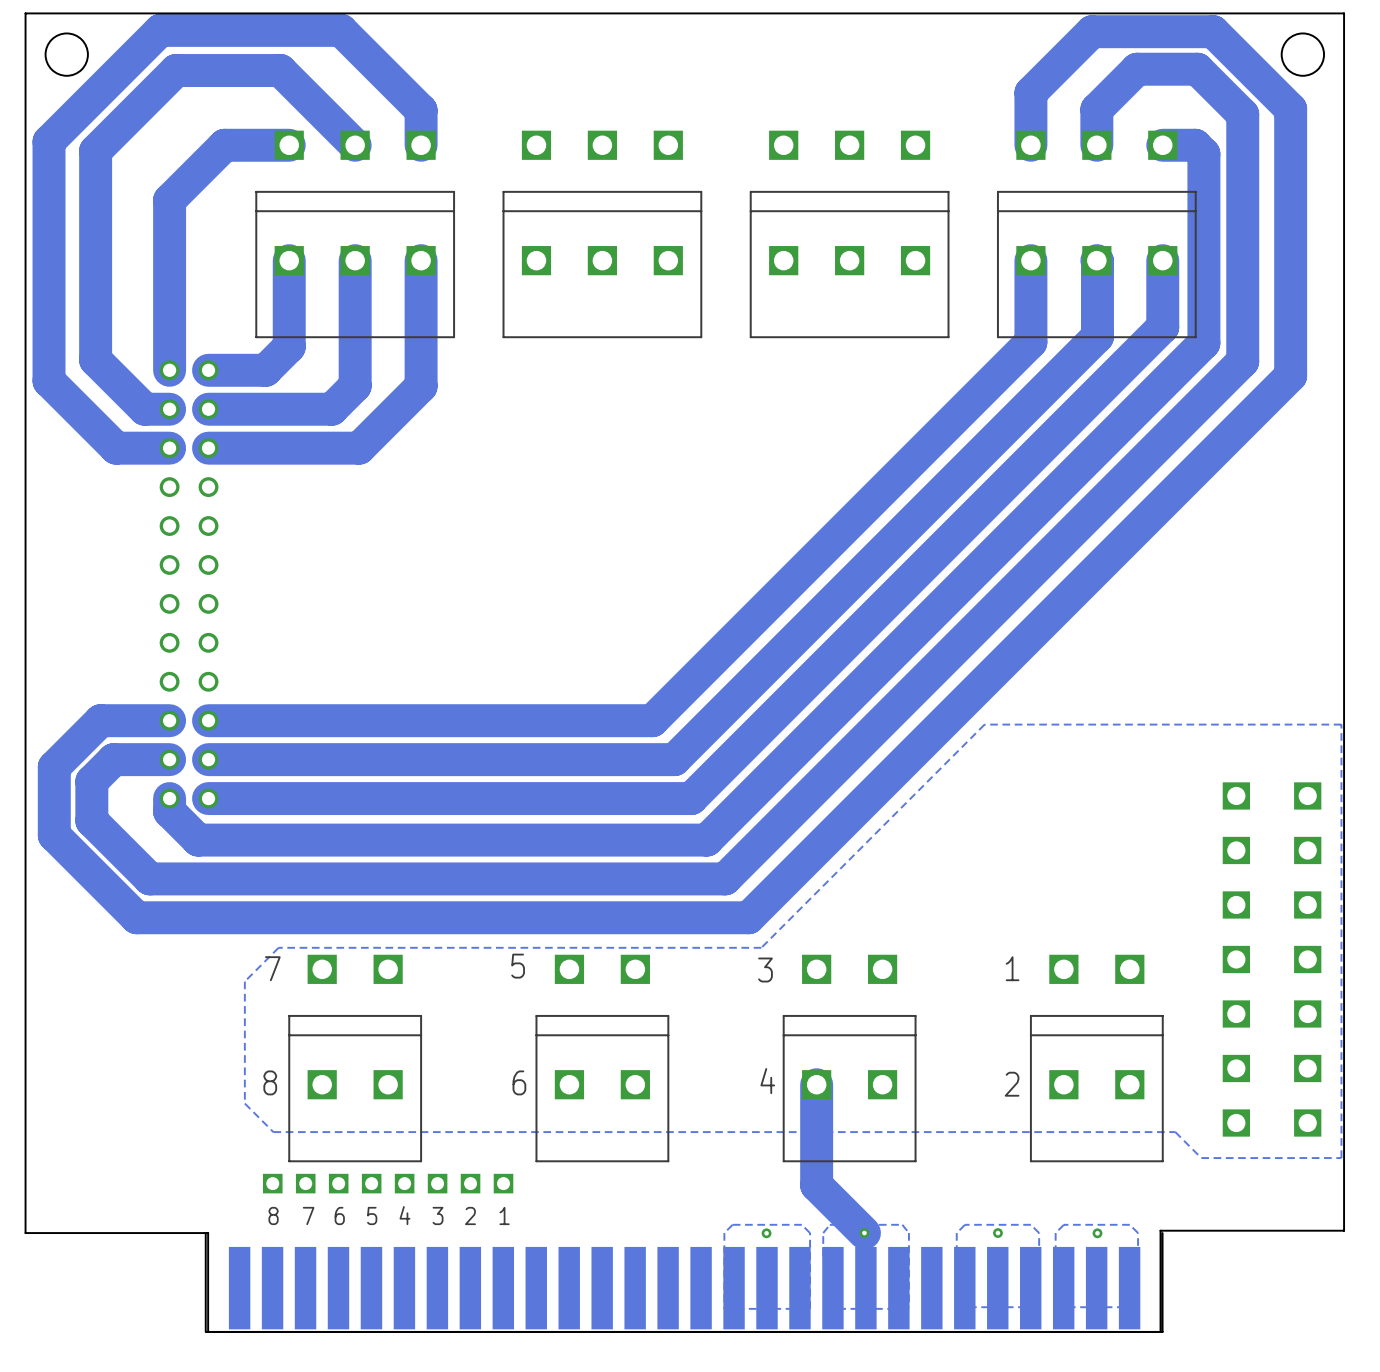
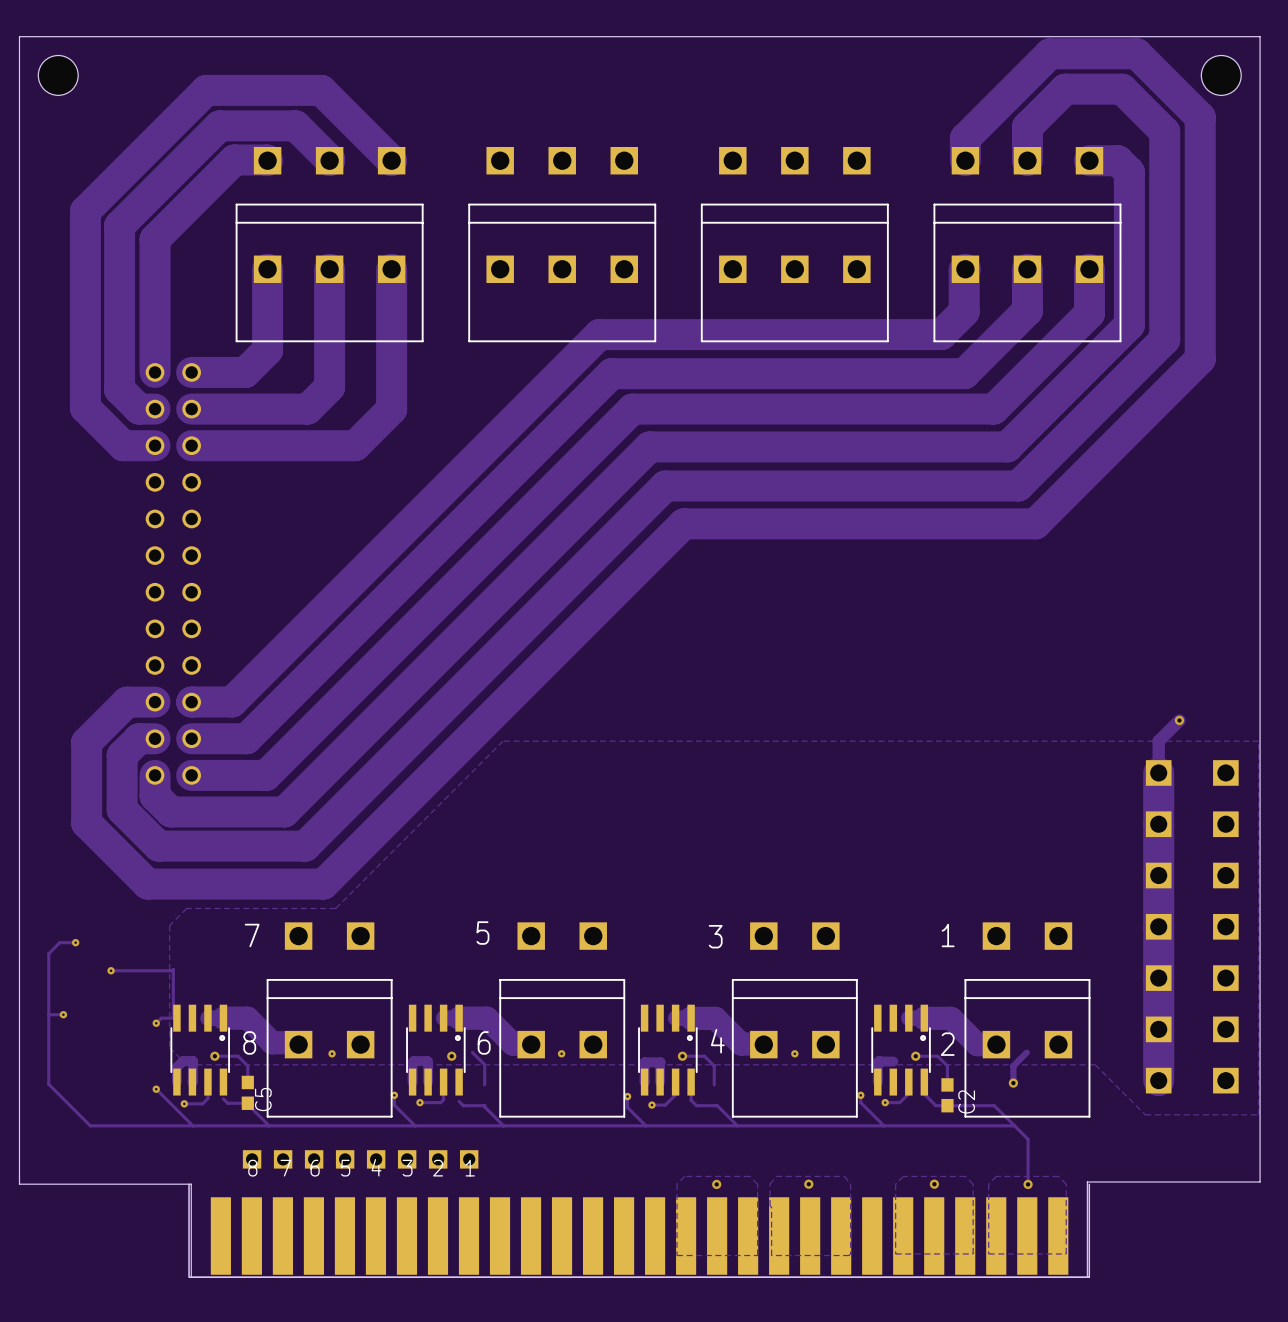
track: (224, 70) (176, 70) (95, 150) (95, 199) -> (206, 90) (85, 211)
track: (280, 70) (355, 145) -> (259, 90) (321, 90) (391, 160)
track: (1030, 121) (1030, 92) (1092, 31) (1213, 31) (1290, 109) (1290, 375) (748, 917) (136, 917) (54, 835) (54, 767) (100, 720) (139, 720) -> (965, 138) (1050, 53) (1136, 53) (1200, 117) (1200, 359) (1035, 523) (683, 523) (323, 884) (147, 884) (86, 823) (86, 742) (126, 702)
track: (289, 145) (224, 145) (169, 200) (169, 228) -> (267, 160) (234, 159) (155, 239)
track: none -> (329, 160) (295, 125) (219, 125) (119, 225) (119, 389) (139, 409)
track: (421, 145) (421, 110) (341, 30) (160, 30) (49, 141) (49, 380) (116, 448) (135, 448) -> none
track: (1193, 145) (1203, 153) (1203, 343) (706, 840) (198, 840) (169, 811) -> (1117, 160) (1129, 172) (1129, 324) (1007, 446) (649, 446) (284, 811) (170, 811) (155, 796) (155, 787)
track: (1030, 260) (1030, 342) (652, 720) (208, 720) -> (965, 269) (964, 311) (941, 334) (599, 334) (232, 701) (191, 701)
track: (1096, 260) (1097, 336) (674, 759) (266, 759) -> (1027, 269) (1027, 310) (964, 373) (611, 373) (246, 738)
track: (1162, 307) (1162, 327) (691, 798) (287, 798) -> (1089, 313) (993, 409) (632, 409) (266, 775)
track: (1242, 335) (1242, 361) (725, 878) (149, 878) (91, 820) (91, 781) (113, 759) (152, 759) -> (1164, 339) (1018, 486) (665, 486) (305, 846) (158, 846) (122, 809) (122, 755) (139, 738)
track: (95, 360) (144, 409) (152, 409) -> (85, 362) (85, 407) (123, 445)
track: (421, 386) (359, 448) -> (391, 387) (391, 409) (355, 445) (333, 445)
zone outline: (1341, 724) (984, 724) (761, 947) (278, 947) (244, 981) (244, 1103) (273, 1132) (1175, 1132) (1201, 1158) (1341, 1158) (1341, 724) -> (1258, 741) (1258, 1114) (1145, 1114) (1095, 1064) (186, 1064) (169, 1047) (169, 925) (186, 908) (335, 908) (503, 741) (1258, 741)
track: none -> (1179, 720) (1158, 741) (1158, 1080)
via: none -> (1179, 720)
track: none -> (75, 942) (59, 942) (48, 953) (48, 1084) (90, 1125) (1014, 1125)
via: none -> (75, 942)
track: none -> (111, 970) (173, 969) (174, 1018)
via: none -> (111, 970)
track: none -> (63, 1014) (48, 1014)
via: none -> (63, 1014)
track: none -> (176, 1018) (161, 1018) (156, 1023)
track: none -> (207, 1018) (247, 1018) (272, 1042) (299, 1042)
track: none -> (443, 1018) (486, 1018) (512, 1044) (531, 1044)
track: none -> (675, 1018) (715, 1018) (741, 1044) (763, 1044)
track: none -> (908, 1018) (951, 1018) (977, 1044) (995, 1044)
via: none -> (156, 1023)
track: (816, 1084) (816, 1185) (864, 1233) -> none
part: none -> (200, 1050)
part: none -> (435, 1050)
part: none -> (667, 1050)
part: none -> (901, 1050)
track: none -> (472, 1052) (484, 1064) (484, 1084)
track: none -> (1026, 1052) (1013, 1066) (1013, 1083)
via: none -> (332, 1053)
via: none -> (561, 1053)
via: none -> (794, 1053)
track: none -> (214, 1056) (238, 1056) (247, 1066) (247, 1082)
via: none -> (214, 1056)
via: none -> (451, 1056)
track: none -> (682, 1056) (704, 1056) (714, 1066) (714, 1084)
via: none -> (682, 1056)
track: none -> (915, 1056) (937, 1056) (947, 1066) (947, 1084)
via: none -> (915, 1056)
track: none -> (893, 1061) (877, 1062) (877, 1082)
track: none -> (192, 1082) (192, 1061) (183, 1061) (176, 1067) (176, 1082)
track: none -> (207, 1082) (207, 1098) (202, 1103) (184, 1103)
track: none -> (428, 1082) (427, 1061) (412, 1062) (412, 1082)
track: none -> (443, 1082) (443, 1099) (440, 1102) (419, 1102)
track: none -> (644, 1082) (644, 1062) (660, 1062) (660, 1082)
track: none -> (675, 1082) (675, 1094) (665, 1105) (651, 1105)
track: none -> (691, 1082) (691, 1100) (696, 1105) (717, 1105) (737, 1125)
track: none -> (908, 1082) (908, 1093) (899, 1102) (885, 1102)
track: none -> (924, 1082) (924, 1094) (935, 1105) (994, 1105) (1006, 1117) (1028, 1139) (1028, 1184)
via: none -> (1013, 1083)
track: none -> (156, 1089) (192, 1125)
via: none -> (156, 1089)
C5: none -> (247, 1092)
track: none -> (394, 1095) (394, 1105) (415, 1125)
via: none -> (394, 1095)
track: none -> (860, 1095) (860, 1102) (883, 1125)
via: none -> (860, 1095)
C2: none -> (947, 1095)
track: none -> (627, 1096) (627, 1107) (645, 1125)
via: none -> (627, 1096)
track: none -> (223, 1098) (227, 1103) (247, 1103) (268, 1125)
track: none -> (459, 1101) (463, 1105) (484, 1105) (503, 1125)
via: none -> (419, 1102)
via: none -> (885, 1102)
via: none -> (184, 1103)
via: none -> (651, 1105)
part: (272, 1183) -> none
part: (305, 1183) -> none
part: (338, 1183) -> none
part: (371, 1183) -> none
part: (404, 1183) -> none
part: (437, 1183) -> none
part: (470, 1183) -> none
part: (503, 1183) -> none
part: none -> (252, 1159)
part: none -> (283, 1159)
part: none -> (314, 1159)
part: none -> (345, 1159)
part: none -> (376, 1159)
part: none -> (407, 1159)
part: none -> (438, 1159)
part: none -> (469, 1159)

